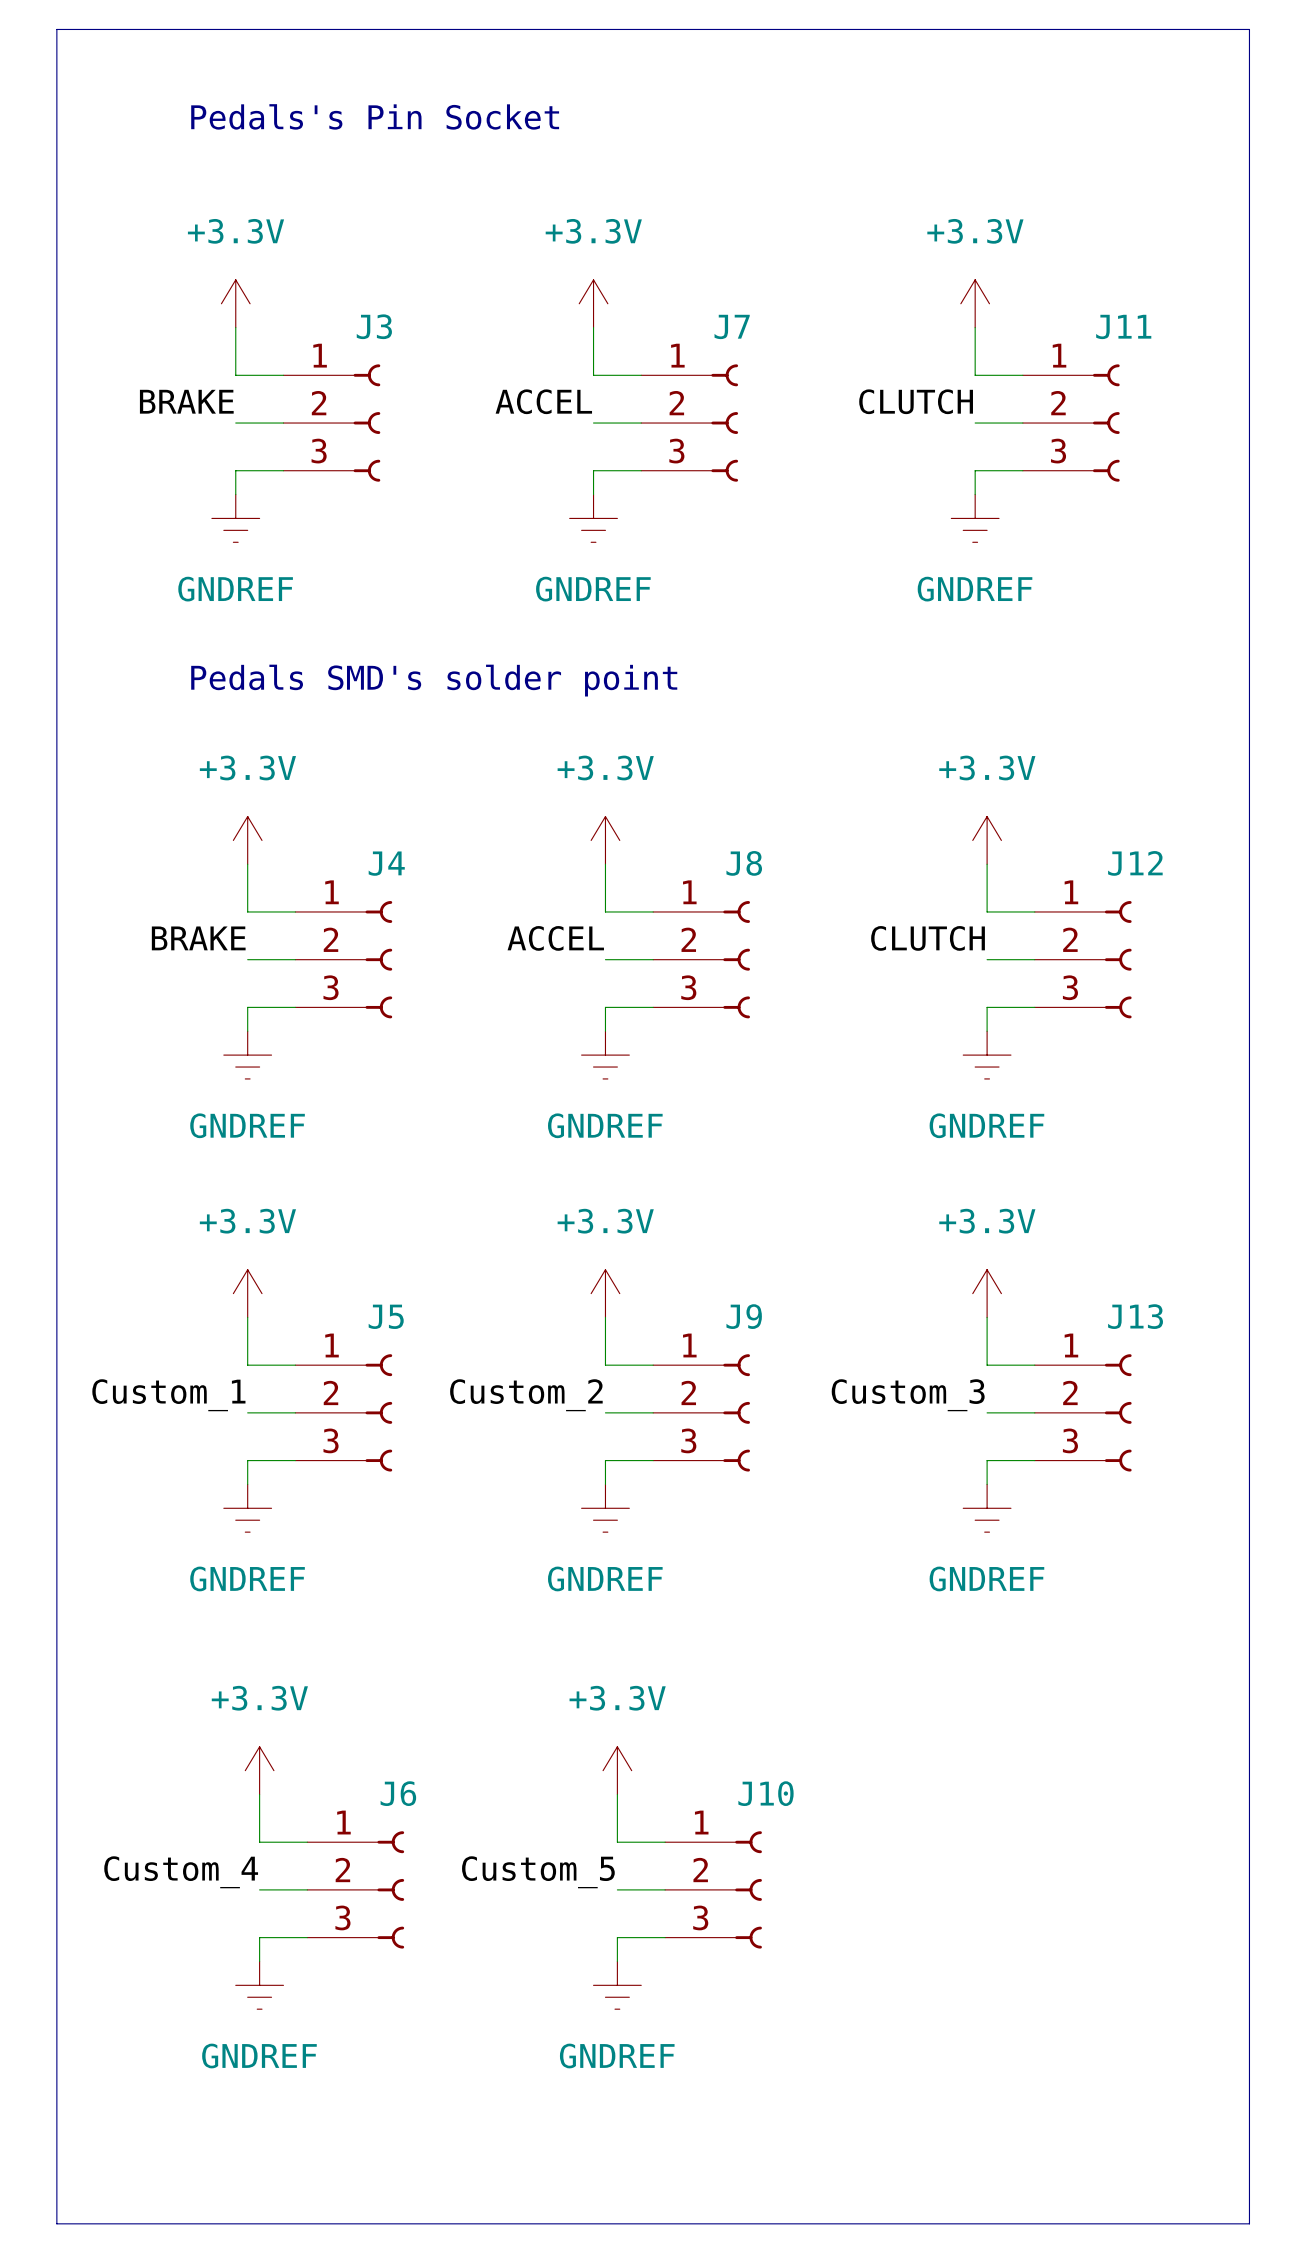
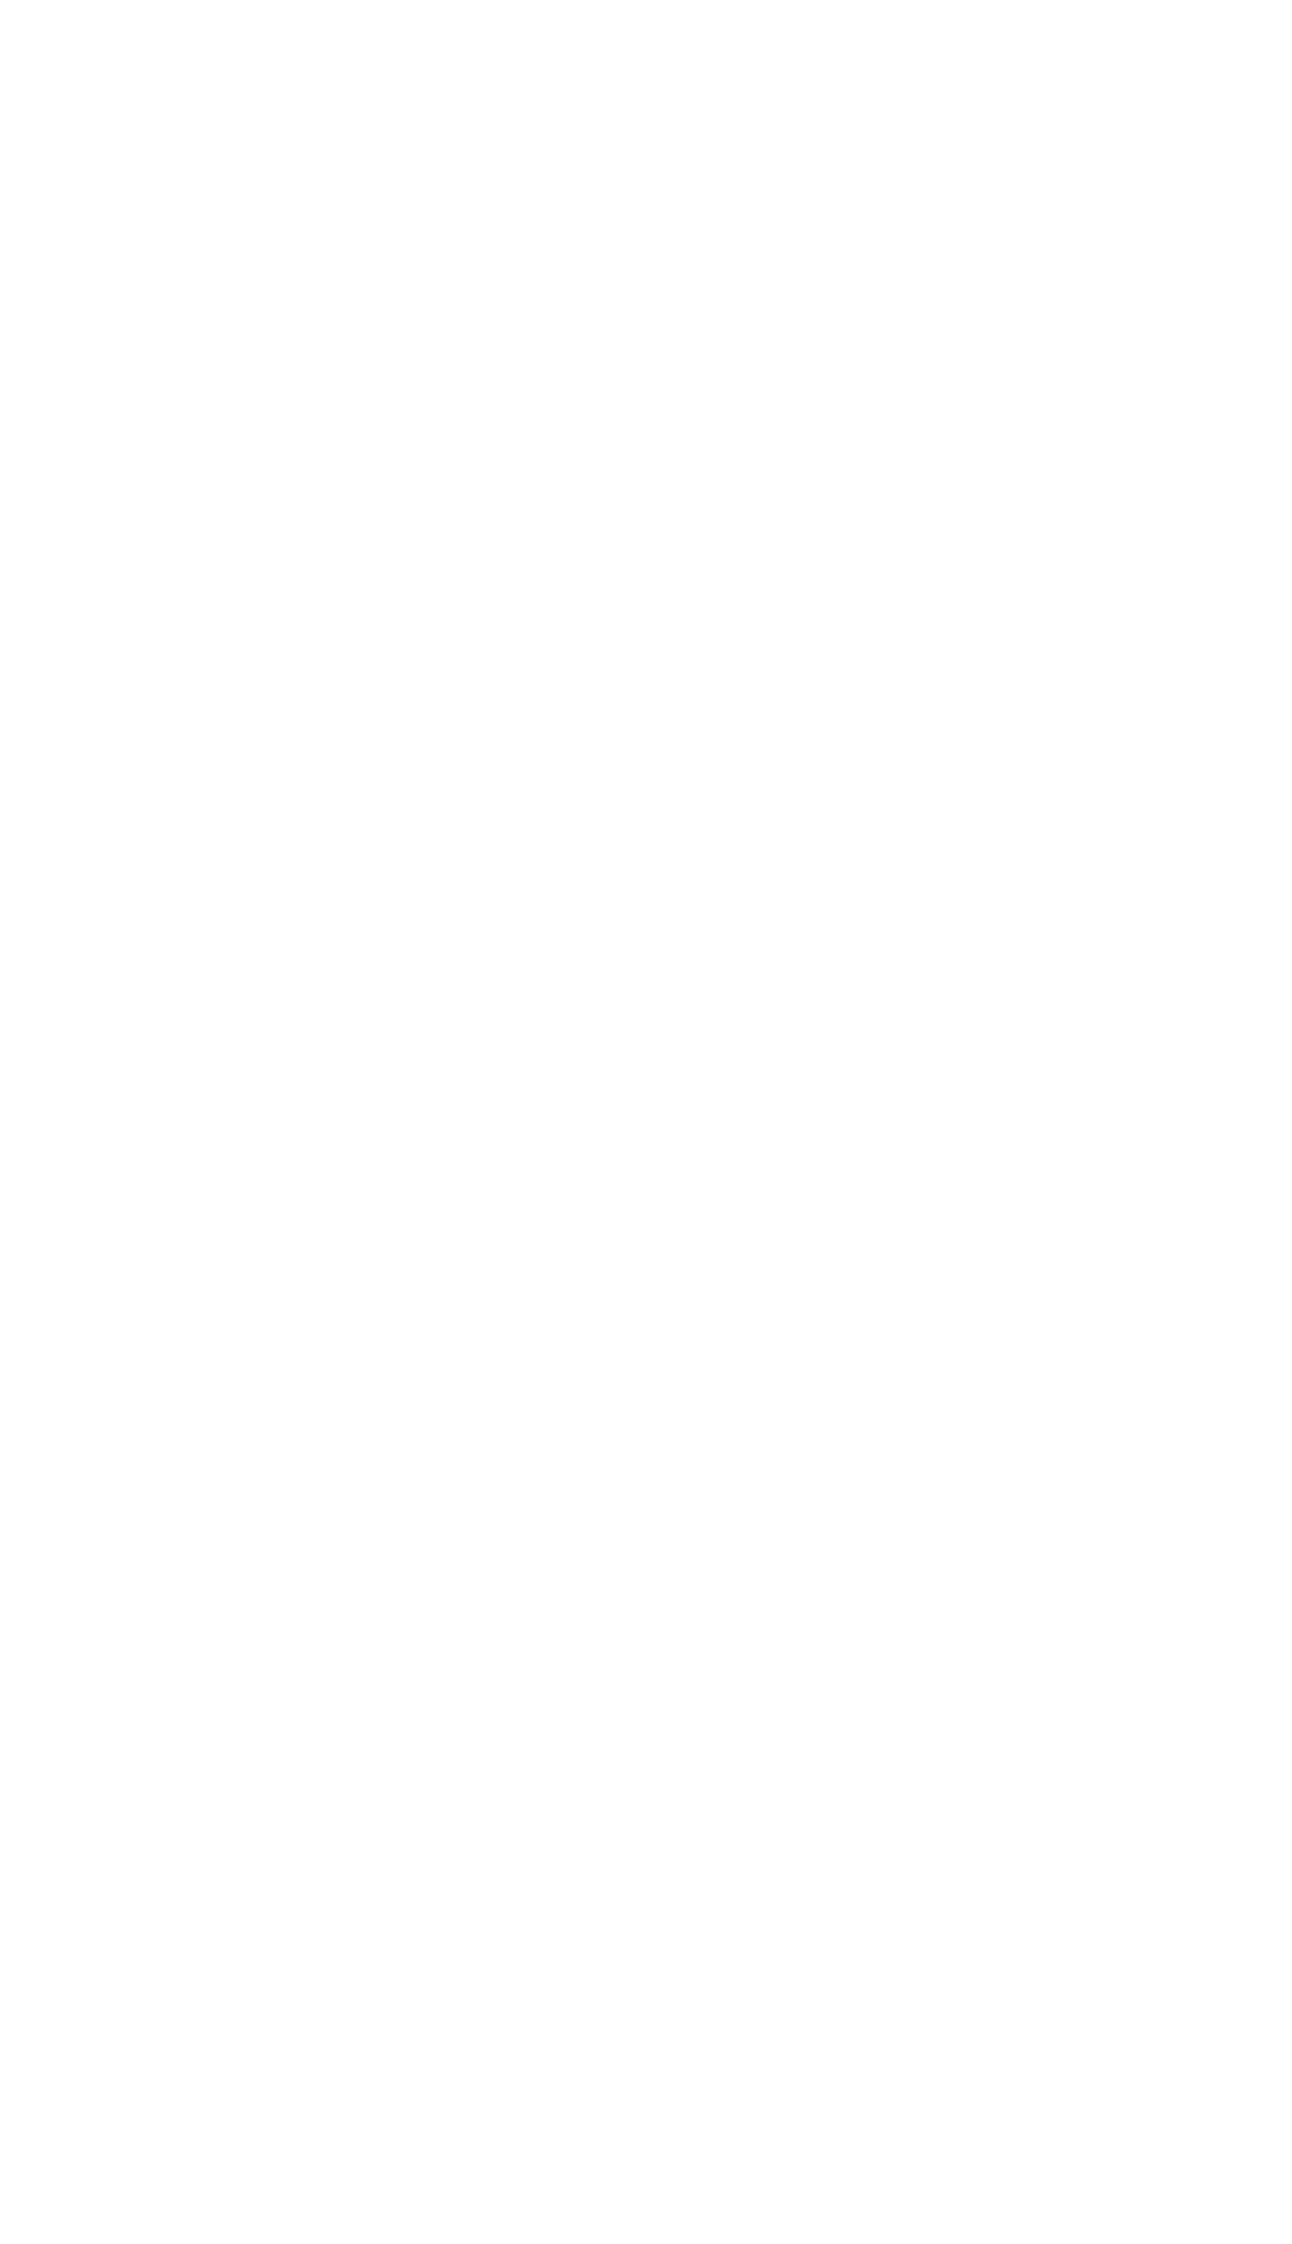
line: (56, 29) (56, 2223) (1249, 2223) (1249, 29) (56, 29) -> none
text: Pedals's Pin Socket (375, 116) -> none
power symbol: +3.3V (235, 303) -> none
power symbol: +3.3V (593, 303) -> none
power symbol: +3.3V (975, 303) -> none
wire: (235, 327) (235, 375) (283, 375) -> none
wire: (593, 327) (593, 375) (641, 375) -> none
wire: (975, 327) (975, 375) (1022, 375) -> none
label: BRAKE (186, 401) -> none
label: ACCEL (543, 401) -> none
label: CLUTCH (916, 401) -> none
wire: (235, 423) (283, 423) -> none
J3: (331, 423) -> none
wire: (593, 423) (641, 423) -> none
J7: (689, 423) -> none
wire: (975, 423) (1022, 423) -> none
J11: (1071, 423) -> none
wire: (283, 470) (235, 470) (235, 494) -> none
wire: (641, 470) (593, 470) (593, 494) -> none
wire: (1022, 470) (975, 470) (975, 494) -> none
power symbol: GNDREF (235, 518) -> none
power symbol: GNDREF (593, 518) -> none
power symbol: GNDREF (975, 518) -> none
text: Pedals SMD's solder point (434, 680) -> none
power symbol: +3.3V (247, 840) -> none
power symbol: +3.3V (605, 840) -> none
power symbol: +3.3V (987, 840) -> none
wire: (247, 864) (247, 911) (295, 911) -> none
wire: (605, 864) (605, 911) (653, 911) -> none
wire: (987, 864) (987, 911) (1034, 911) -> none
label: BRAKE (198, 938) -> none
label: ACCEL (555, 938) -> none
label: CLUTCH (928, 938) -> none
wire: (247, 959) (295, 959) -> none
J4: (343, 959) -> none
wire: (605, 959) (653, 959) -> none
J8: (701, 959) -> none
wire: (987, 959) (1034, 959) -> none
J12: (1083, 959) -> none
wire: (295, 1007) (247, 1007) (247, 1031) -> none
wire: (653, 1007) (605, 1007) (605, 1031) -> none
wire: (1034, 1007) (987, 1007) (987, 1031) -> none
power symbol: GNDREF (247, 1055) -> none
power symbol: GNDREF (605, 1055) -> none
power symbol: GNDREF (987, 1055) -> none
power symbol: +3.3V (247, 1293) -> none
power symbol: +3.3V (605, 1293) -> none
power symbol: +3.3V (987, 1293) -> none
wire: (247, 1317) (247, 1365) (295, 1365) -> none
wire: (605, 1317) (605, 1365) (653, 1365) -> none
wire: (987, 1317) (987, 1365) (1034, 1365) -> none
label: Custom_1 (168, 1395) -> none
label: Custom_2 (526, 1395) -> none
label: Custom_3 (908, 1395) -> none
wire: (247, 1412) (295, 1412) -> none
J5: (343, 1412) -> none
wire: (605, 1412) (653, 1412) -> none
J9: (701, 1412) -> none
wire: (987, 1412) (1034, 1412) -> none
J13: (1083, 1412) -> none
wire: (295, 1460) (247, 1460) (247, 1484) -> none
wire: (653, 1460) (605, 1460) (605, 1484) -> none
wire: (1034, 1460) (987, 1460) (987, 1484) -> none
power symbol: GNDREF (247, 1508) -> none
power symbol: GNDREF (605, 1508) -> none
power symbol: GNDREF (987, 1508) -> none
power symbol: +3.3V (259, 1770) -> none
power symbol: +3.3V (617, 1770) -> none
wire: (259, 1794) (259, 1842) (307, 1842) -> none
wire: (617, 1794) (617, 1842) (665, 1842) -> none
label: Custom_4 (181, 1872) -> none
label: Custom_5 (538, 1872) -> none
wire: (259, 1889) (307, 1889) -> none
J6: (355, 1889) -> none
wire: (617, 1889) (665, 1889) -> none
J10: (713, 1889) -> none
wire: (307, 1937) (259, 1937) (259, 1961) -> none
wire: (665, 1937) (617, 1937) (617, 1961) -> none
power symbol: GNDREF (259, 1985) -> none
power symbol: GNDREF (617, 1985) -> none

